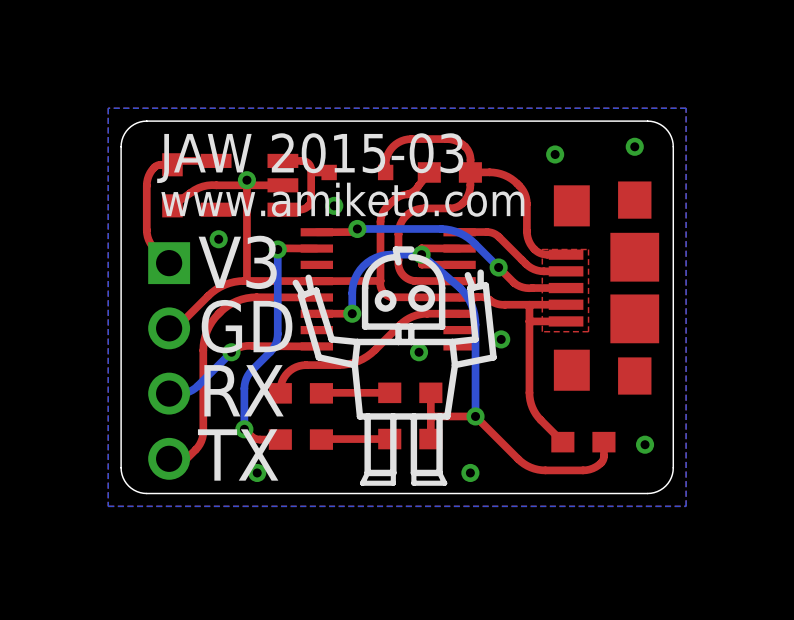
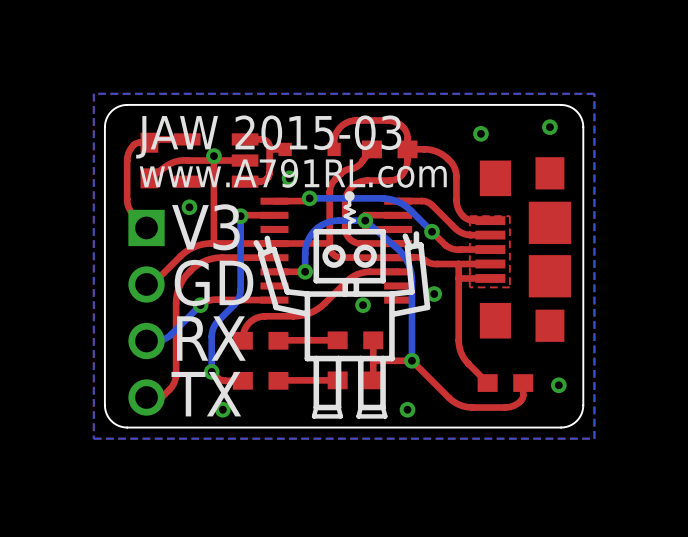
text: www.amiketo.com (342, 199) -> www.A791RL.com (293, 173)
drawing shape: [292, 246, 497, 486] -> [253, 191, 431, 419]

